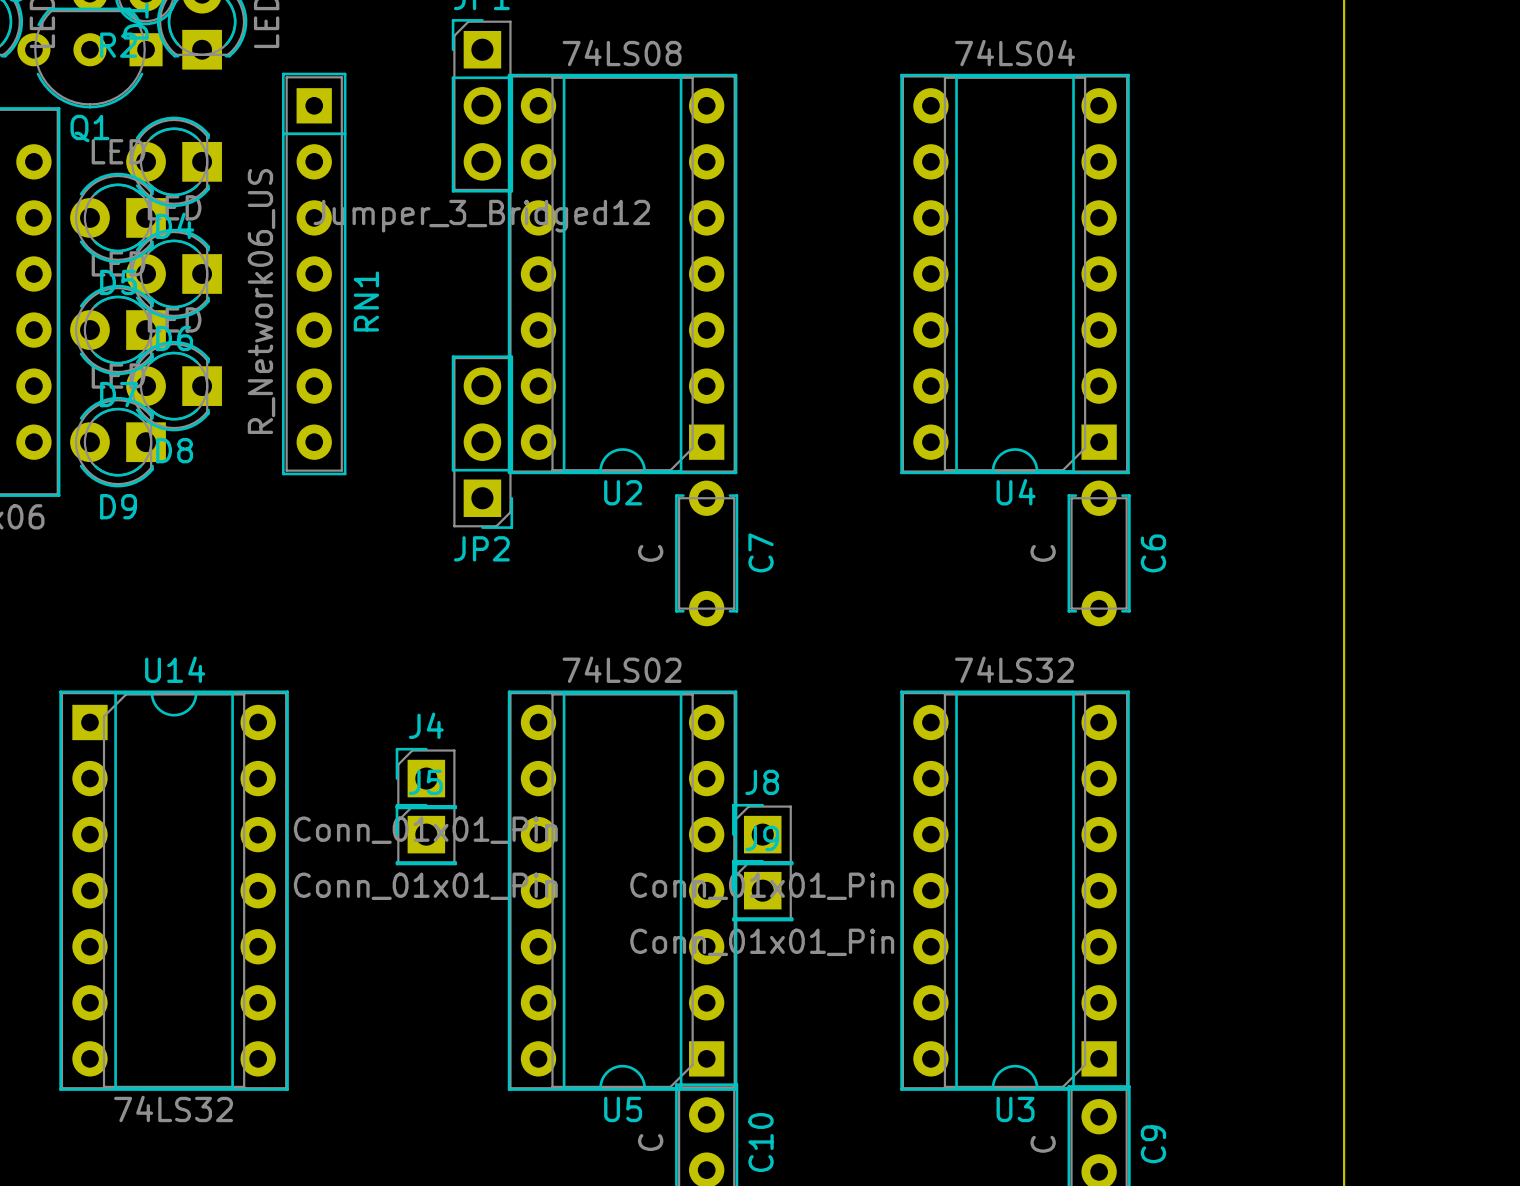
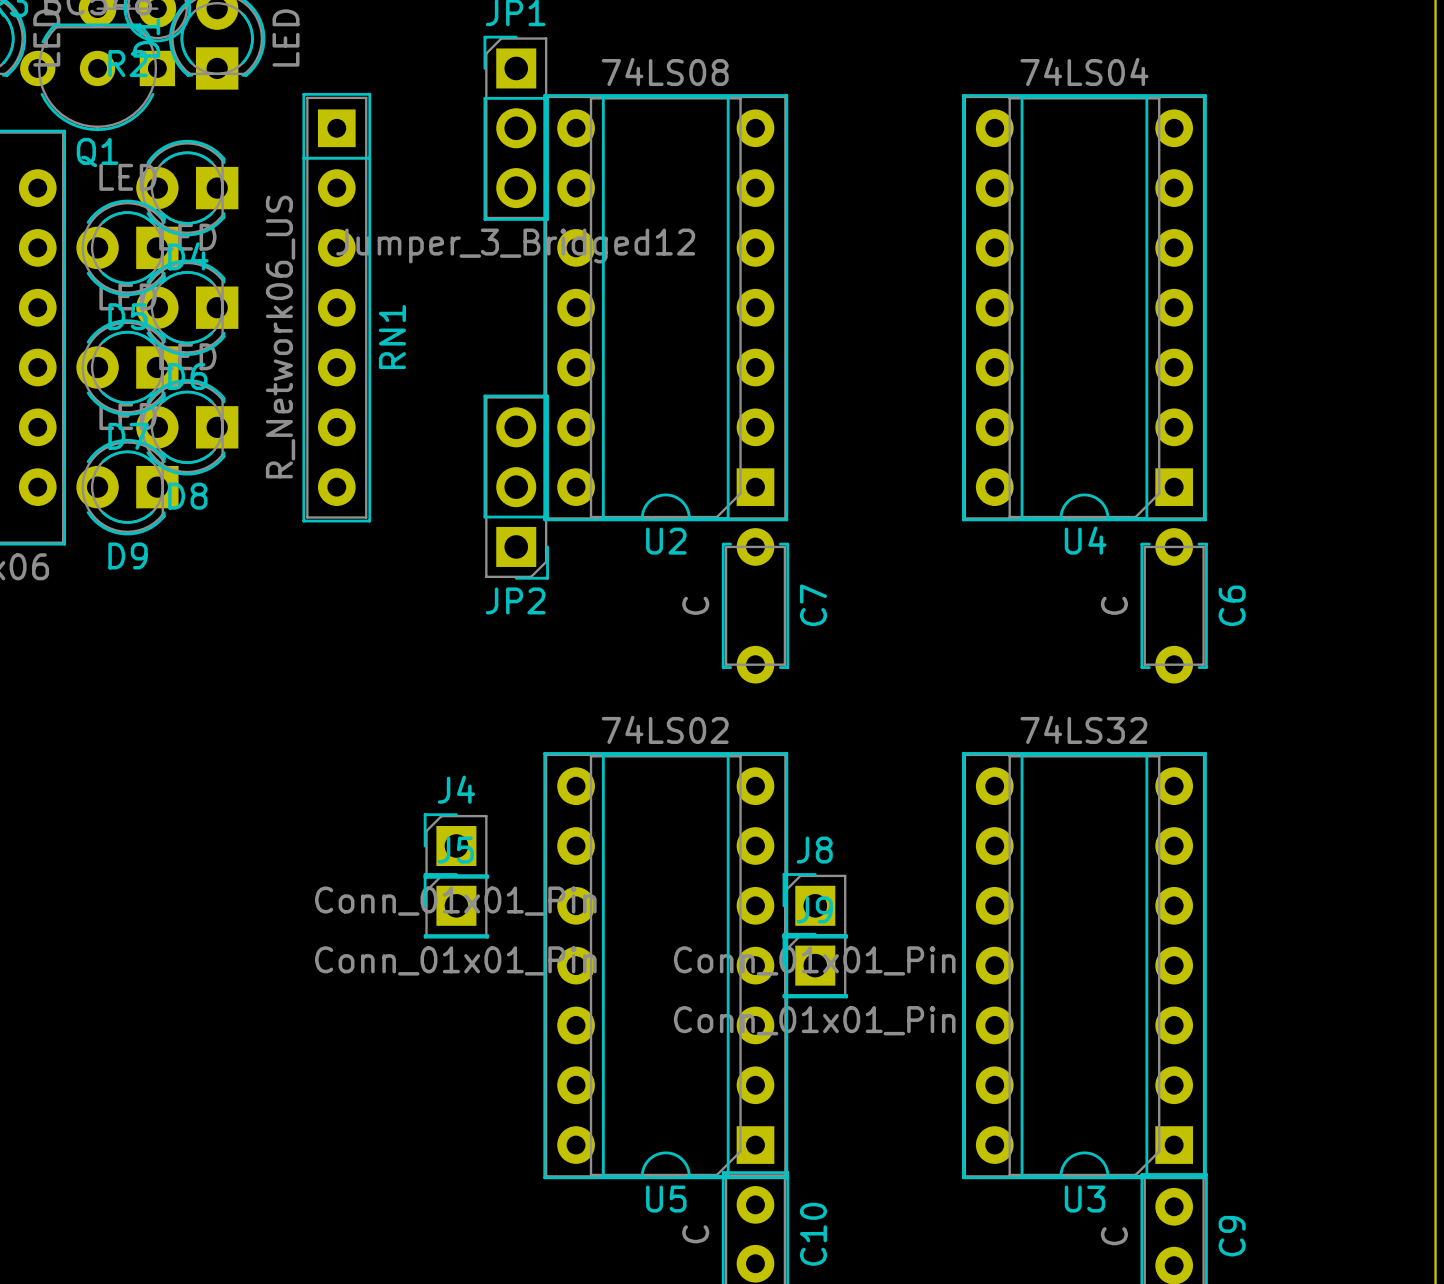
U14: 74LS32 (174, 890) -> none

